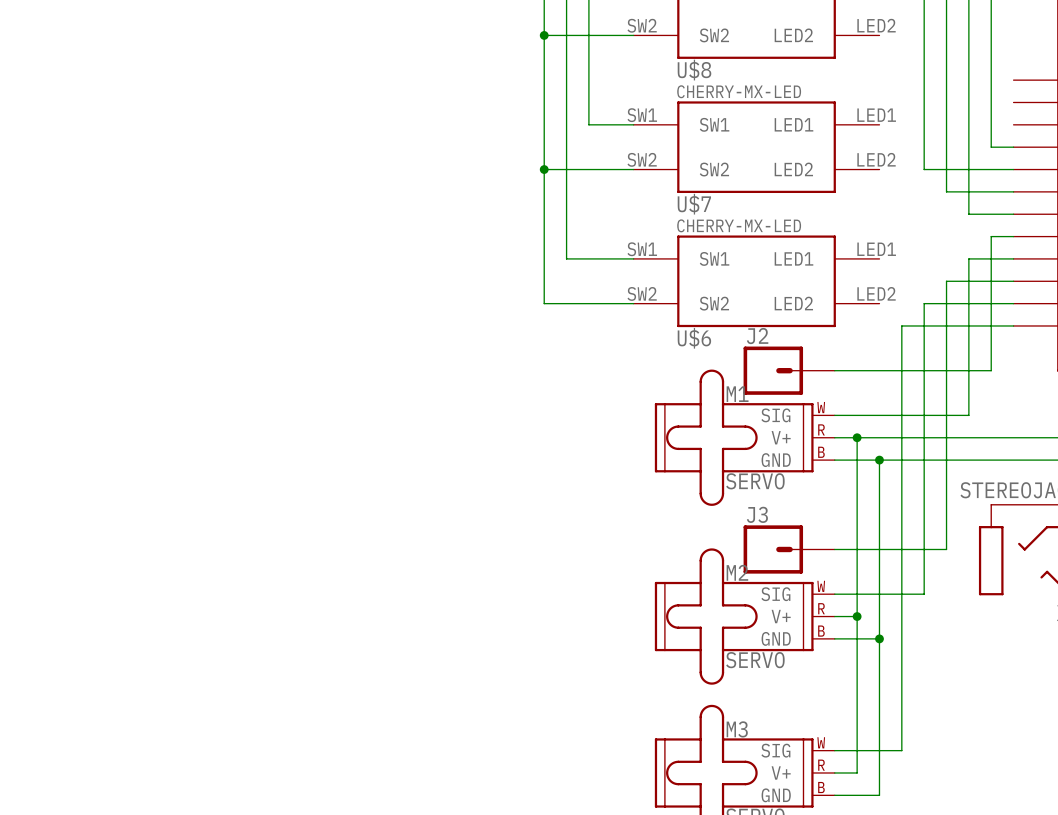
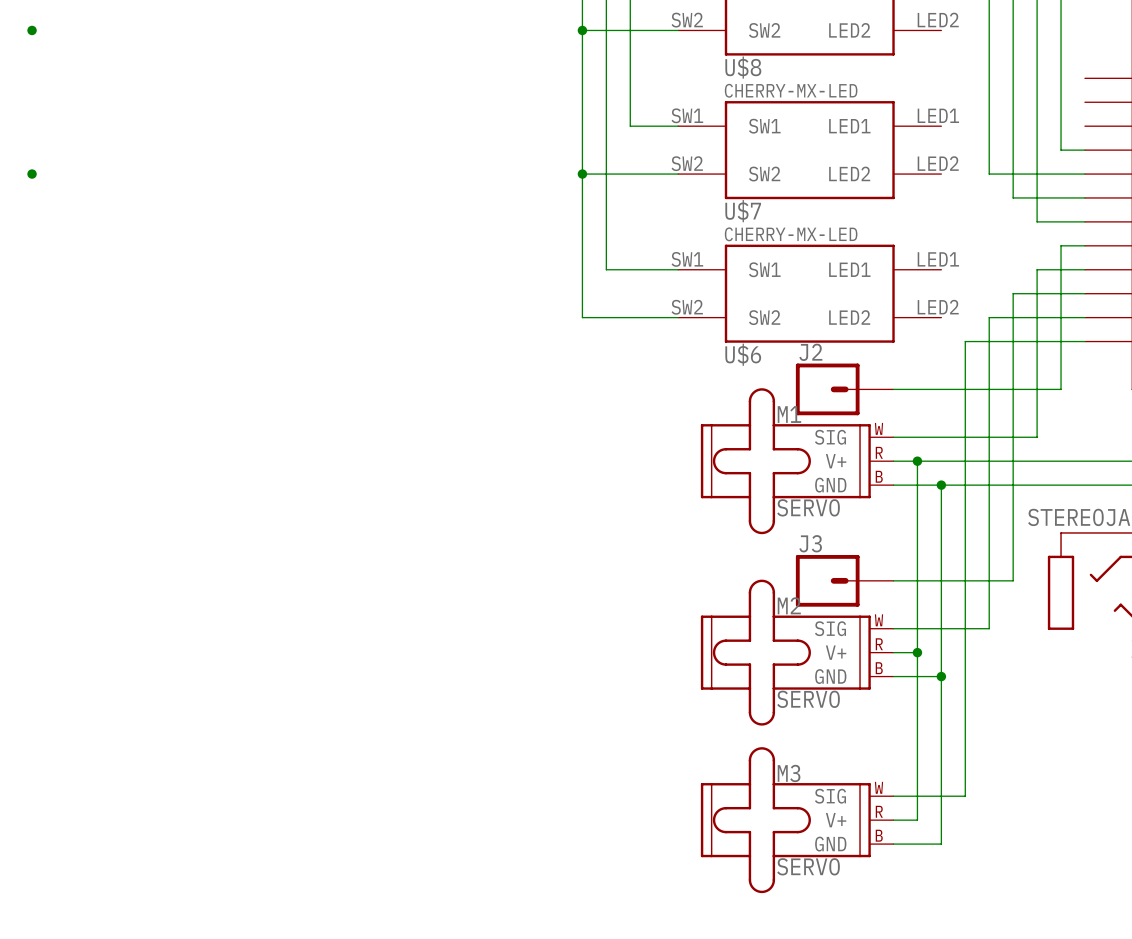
junction: none -> (32, 30)
junction: none -> (32, 174)

